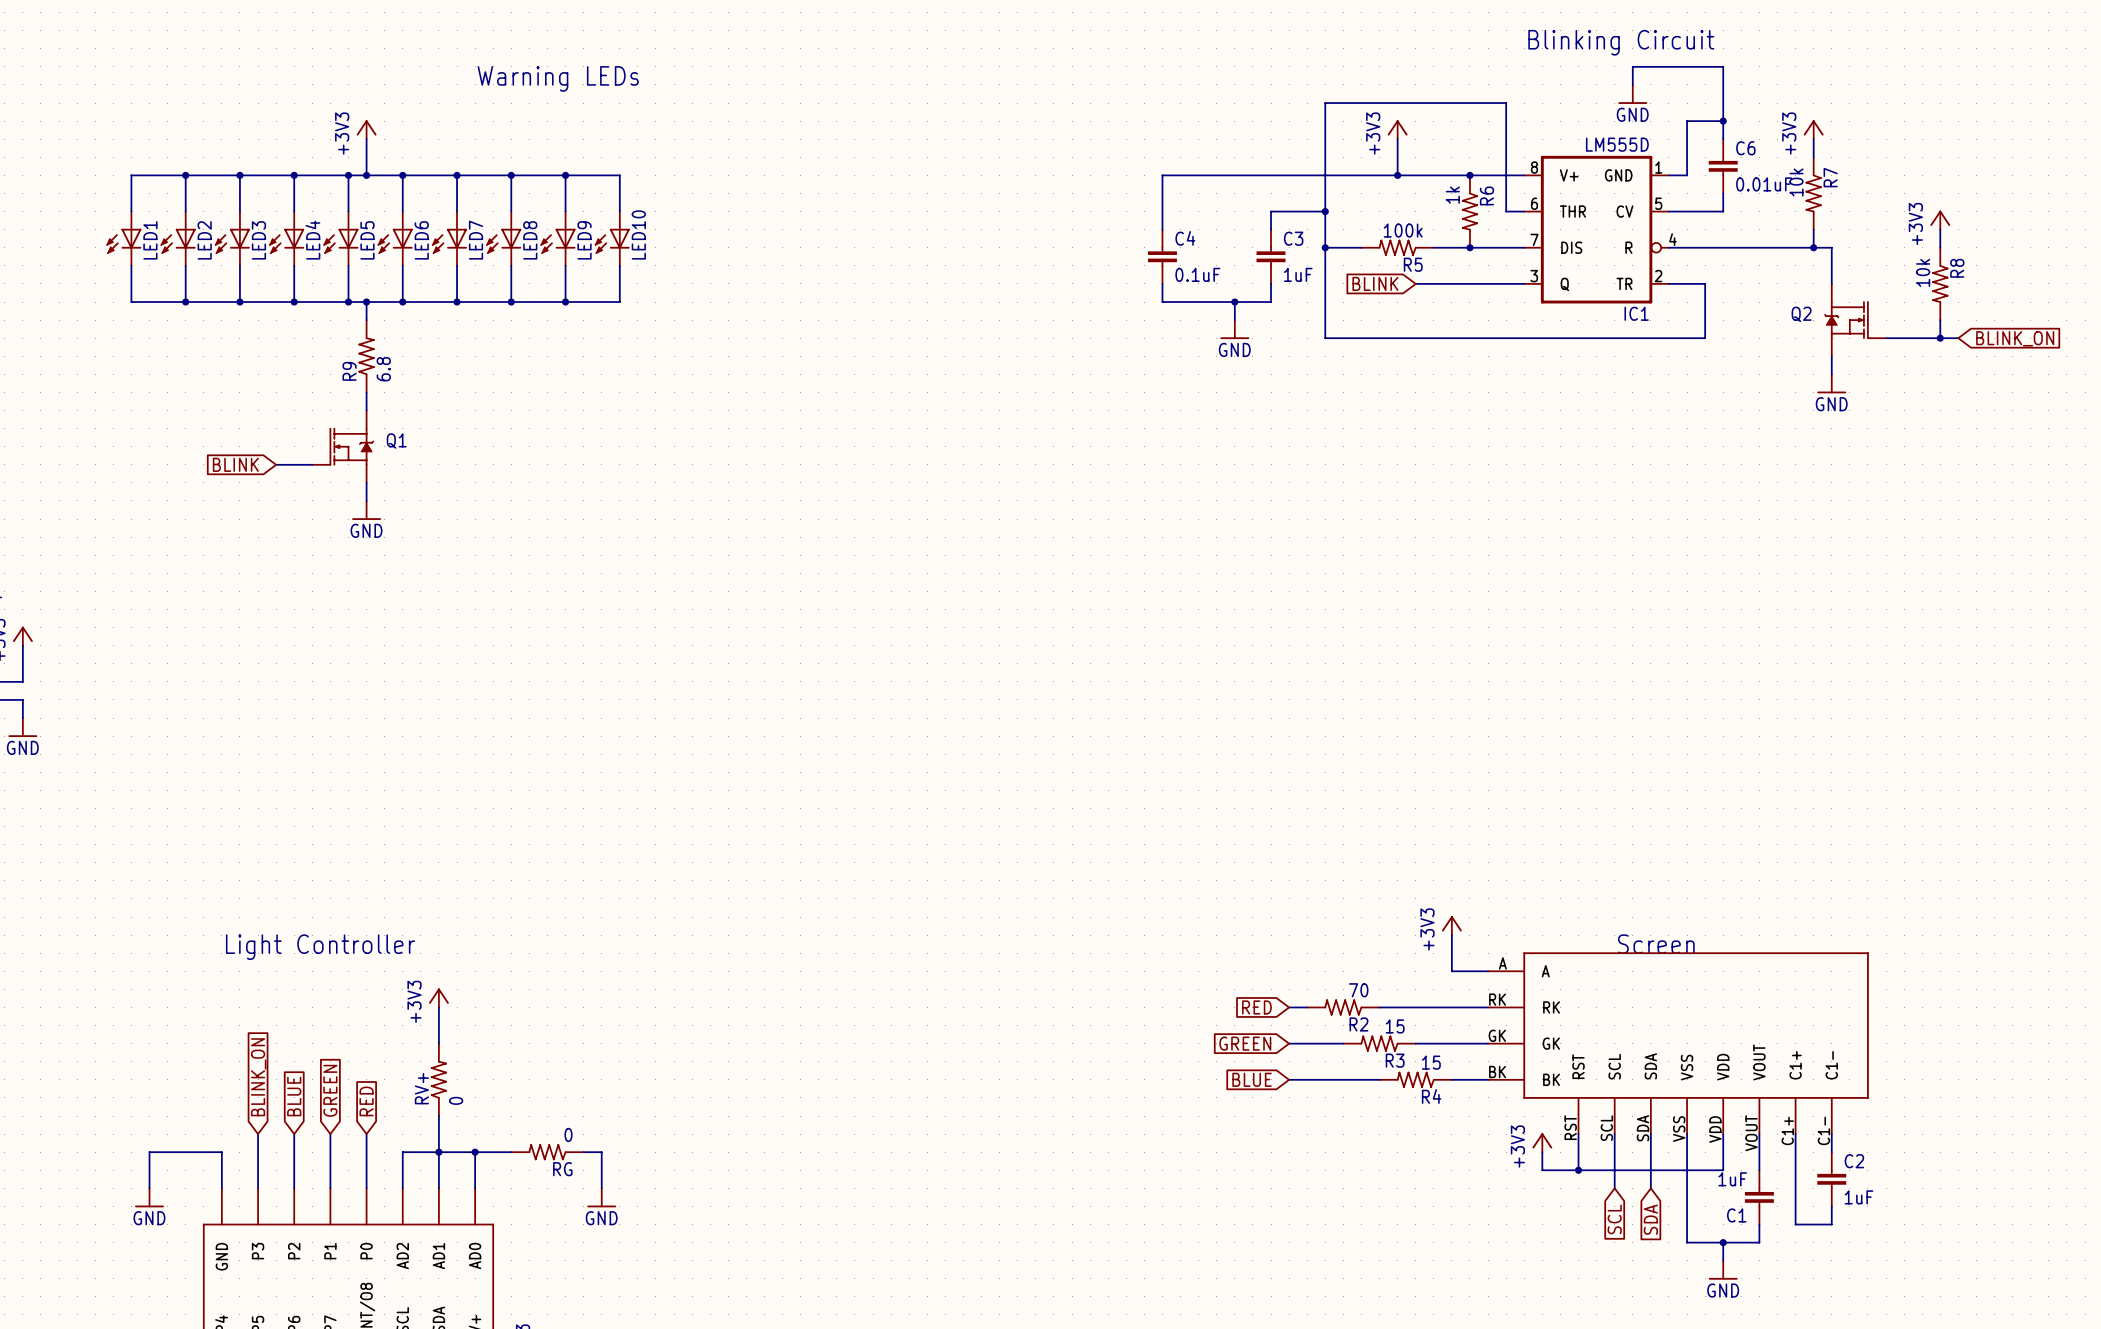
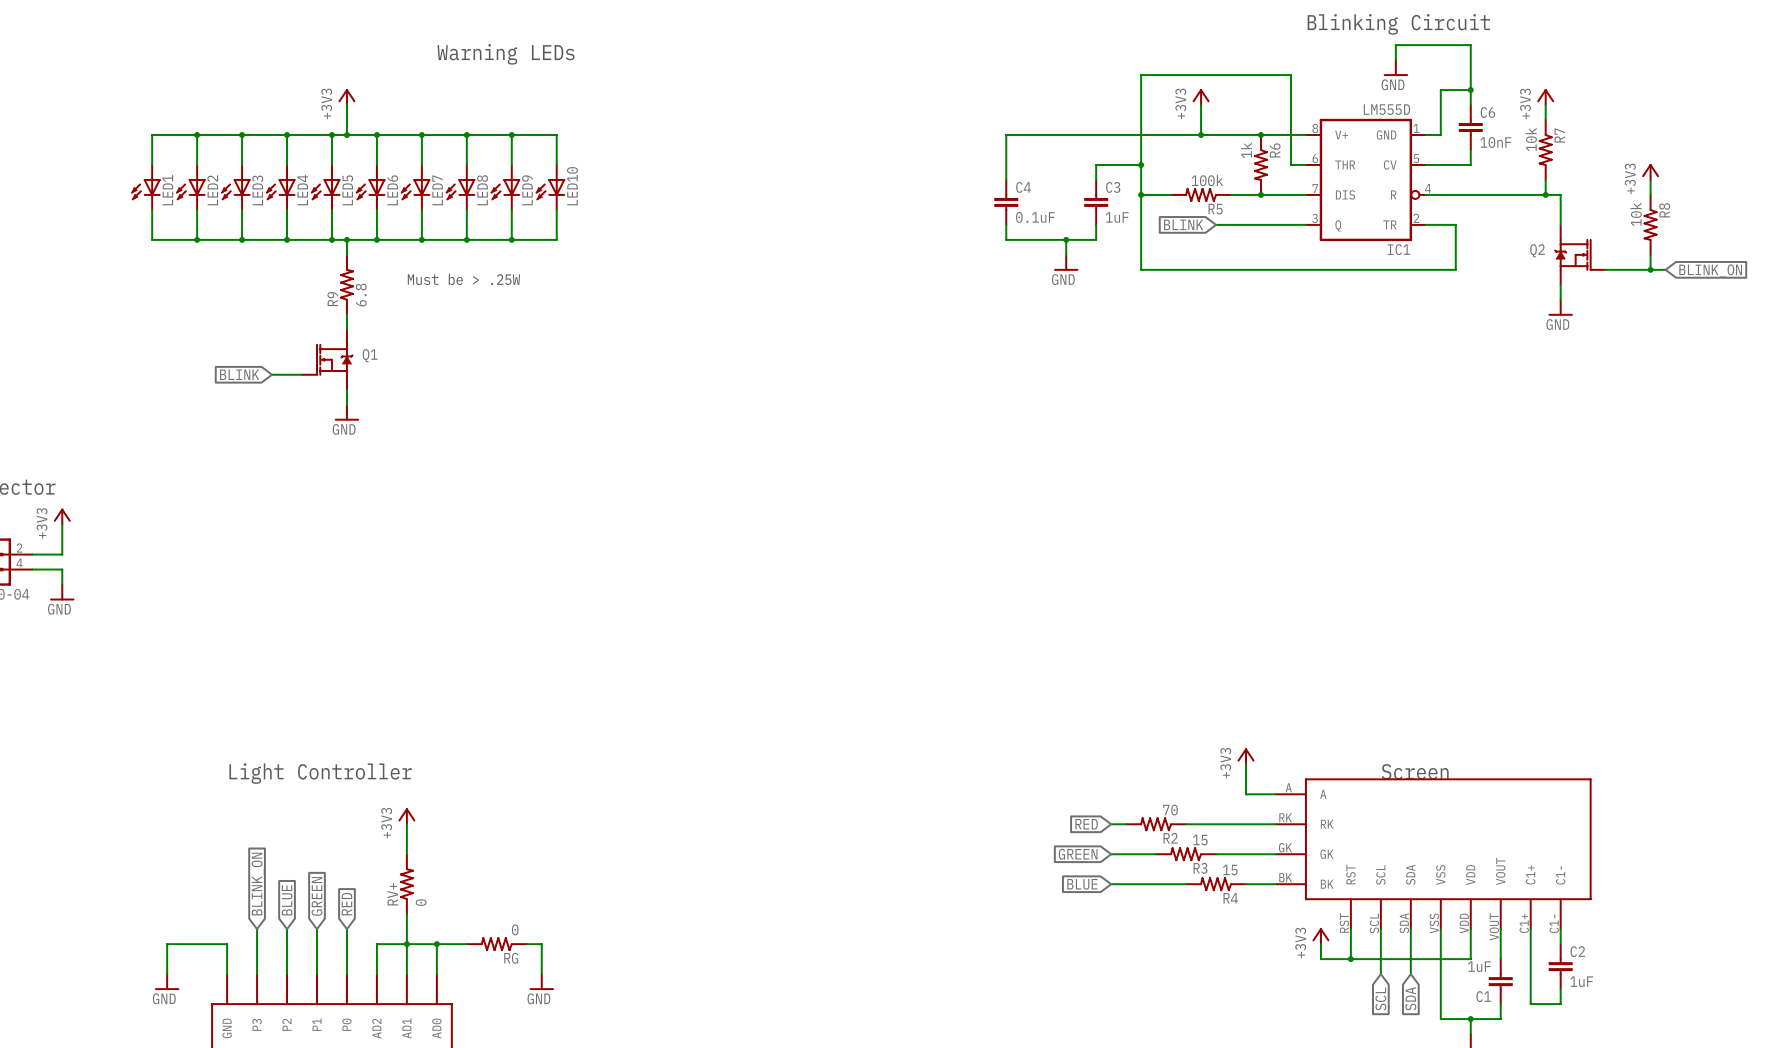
C6 value: 0.01uF (1764, 184) -> 10nF (1495, 142)
text: none -> Must be > .25W (463, 279)

